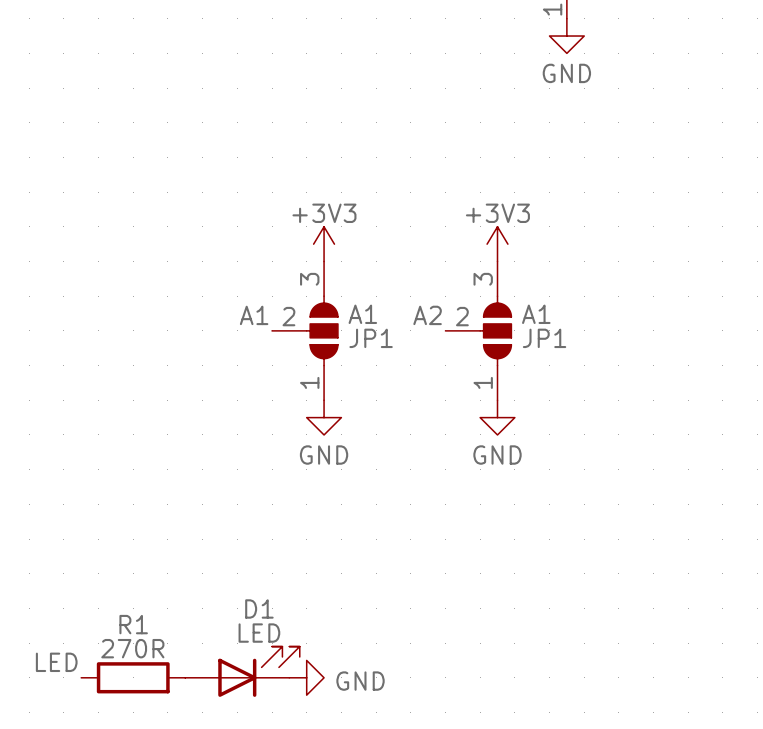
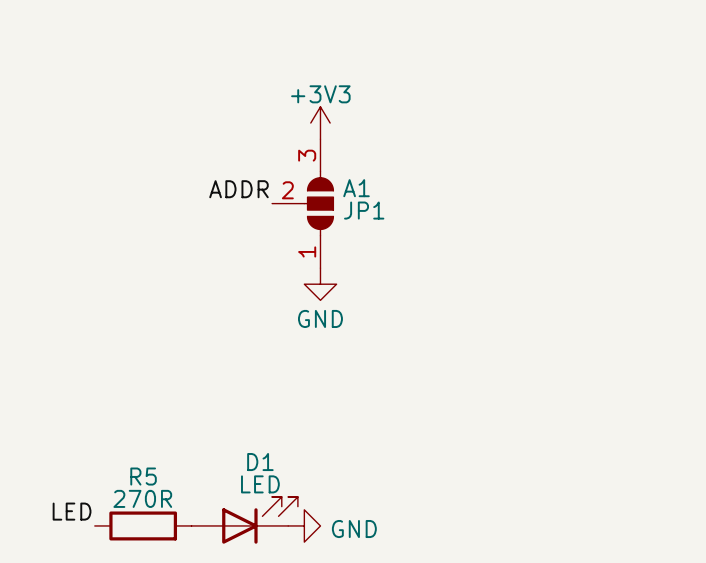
power symbol: +3V3 (497, 244) -> none
label: A1 (254, 315) -> ADDR (238, 189)
label: A2 (427, 315) -> none
JP1: A1 (478, 330) -> none
power symbol: GND (497, 417) -> none
R1 name: R1 (133, 624) -> R5 (143, 476)

